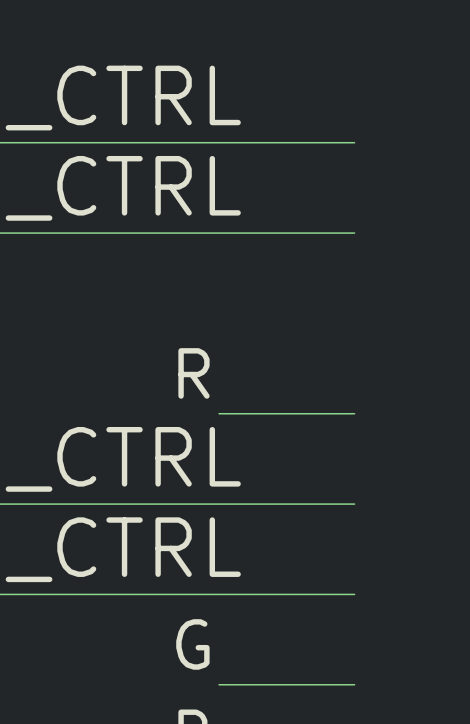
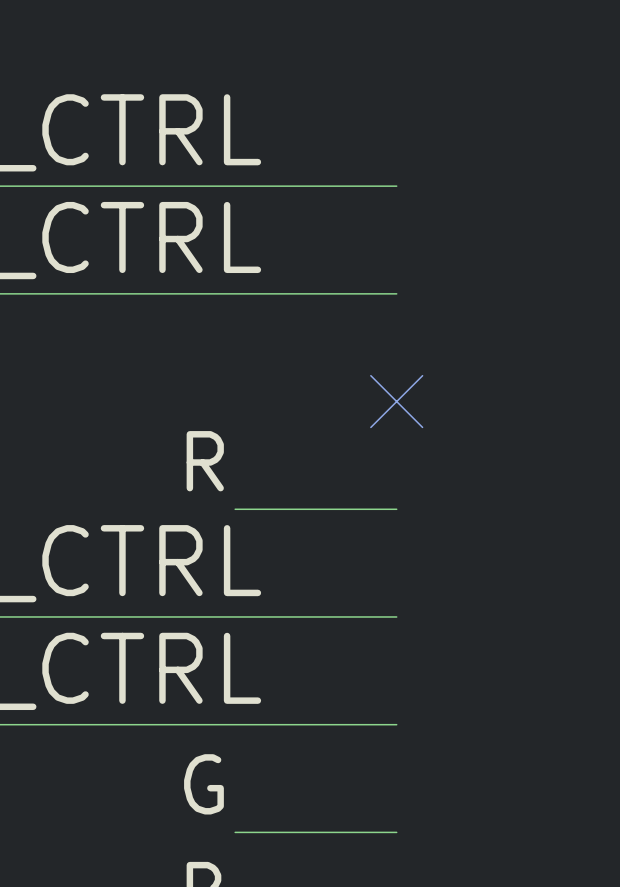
no-connect mark: none -> (396, 401)

